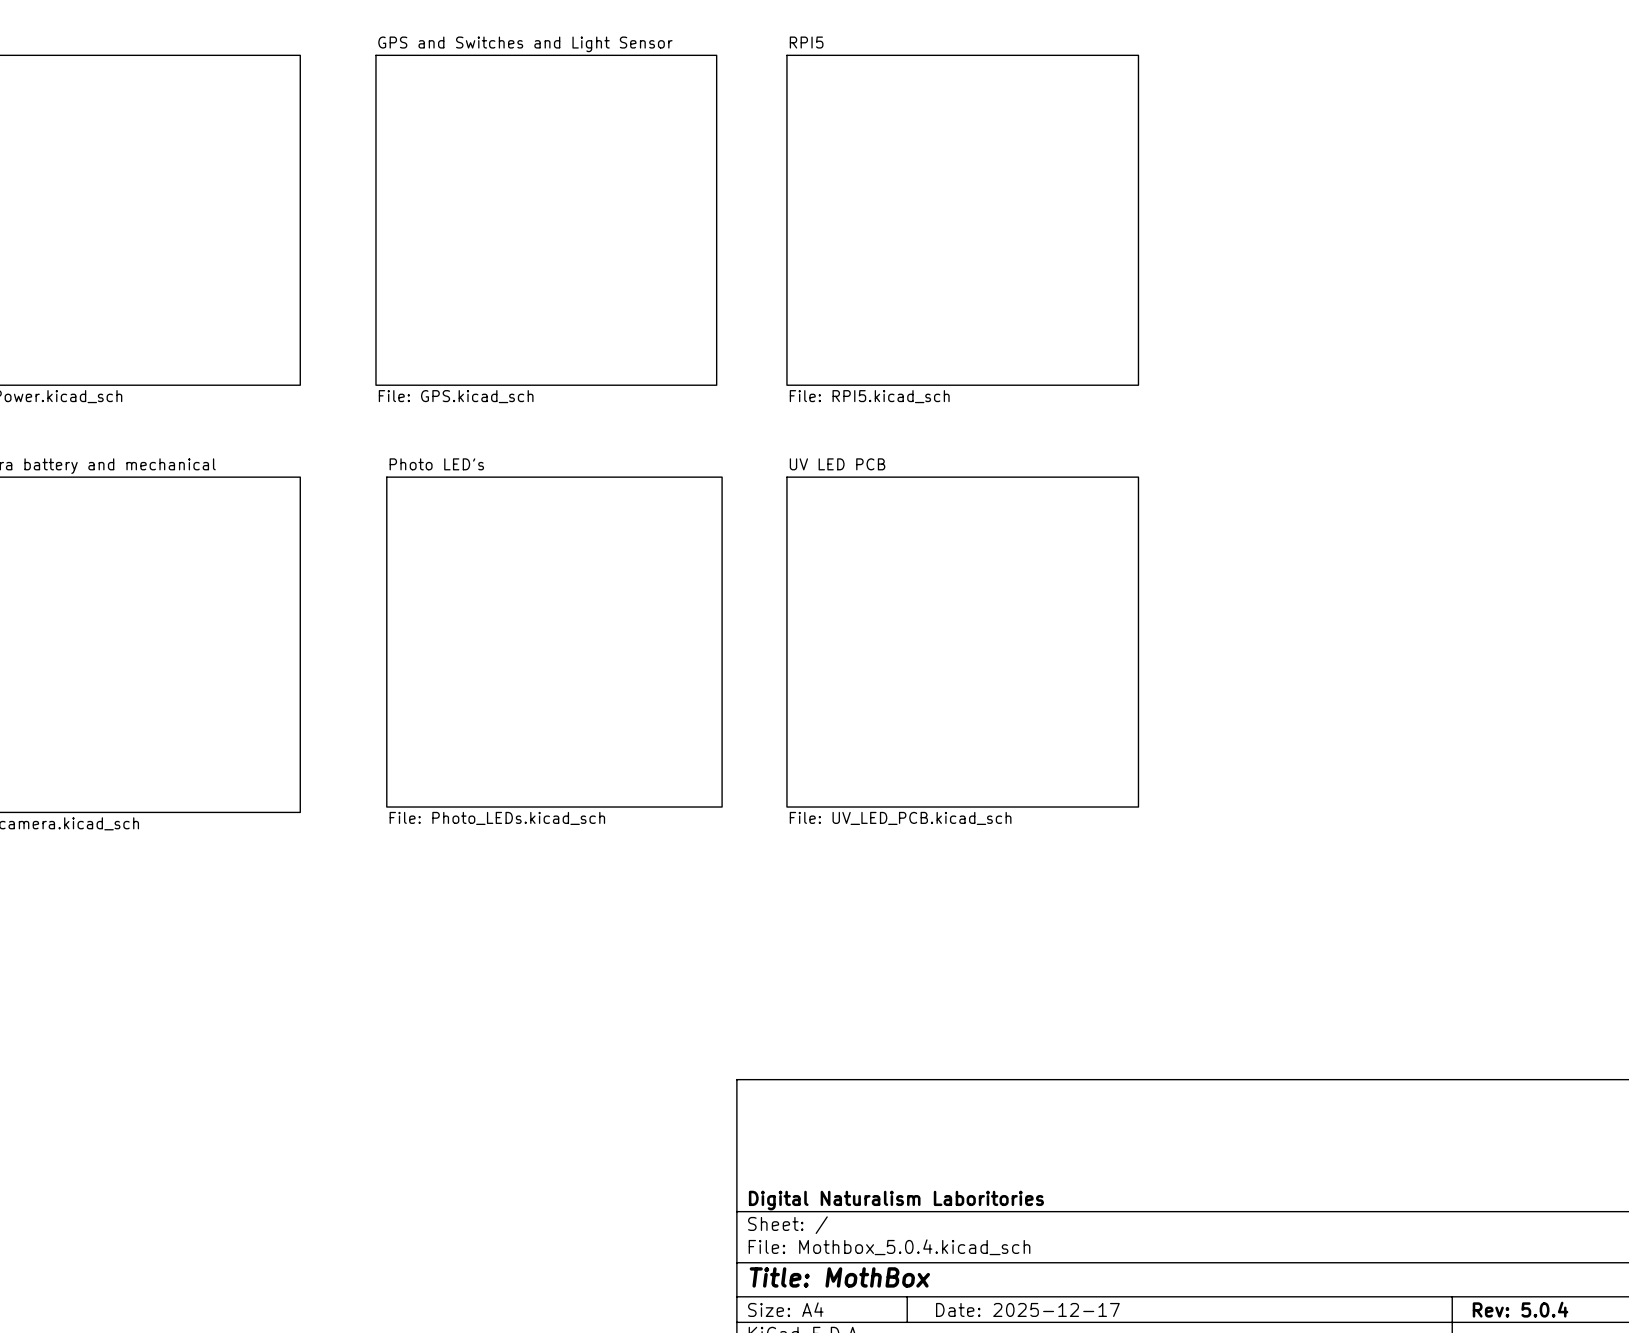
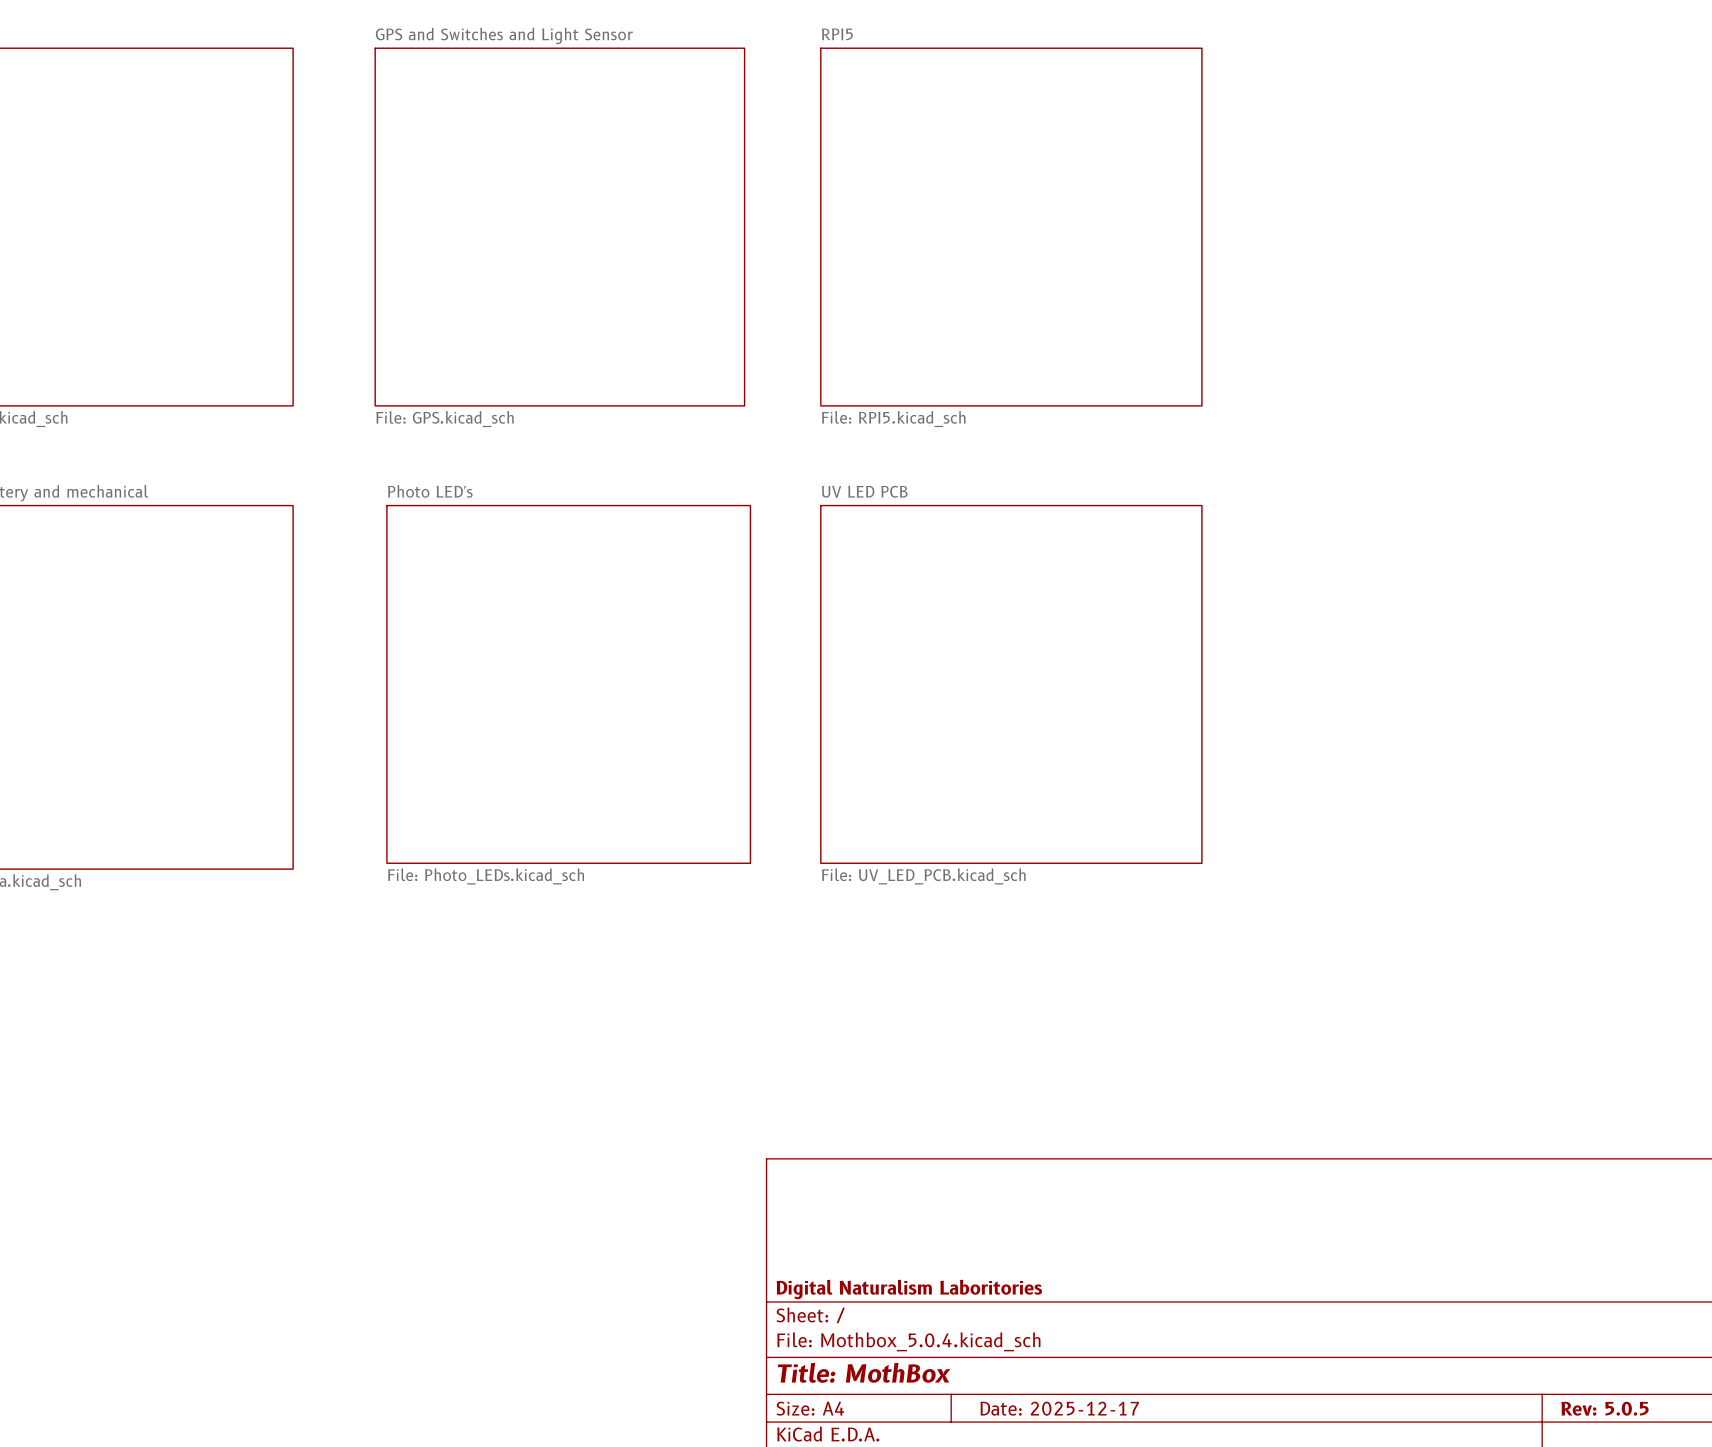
title block: Rev: 5.0.4 (1520, 1309) -> Rev: 5.0.5 (1605, 1408)

